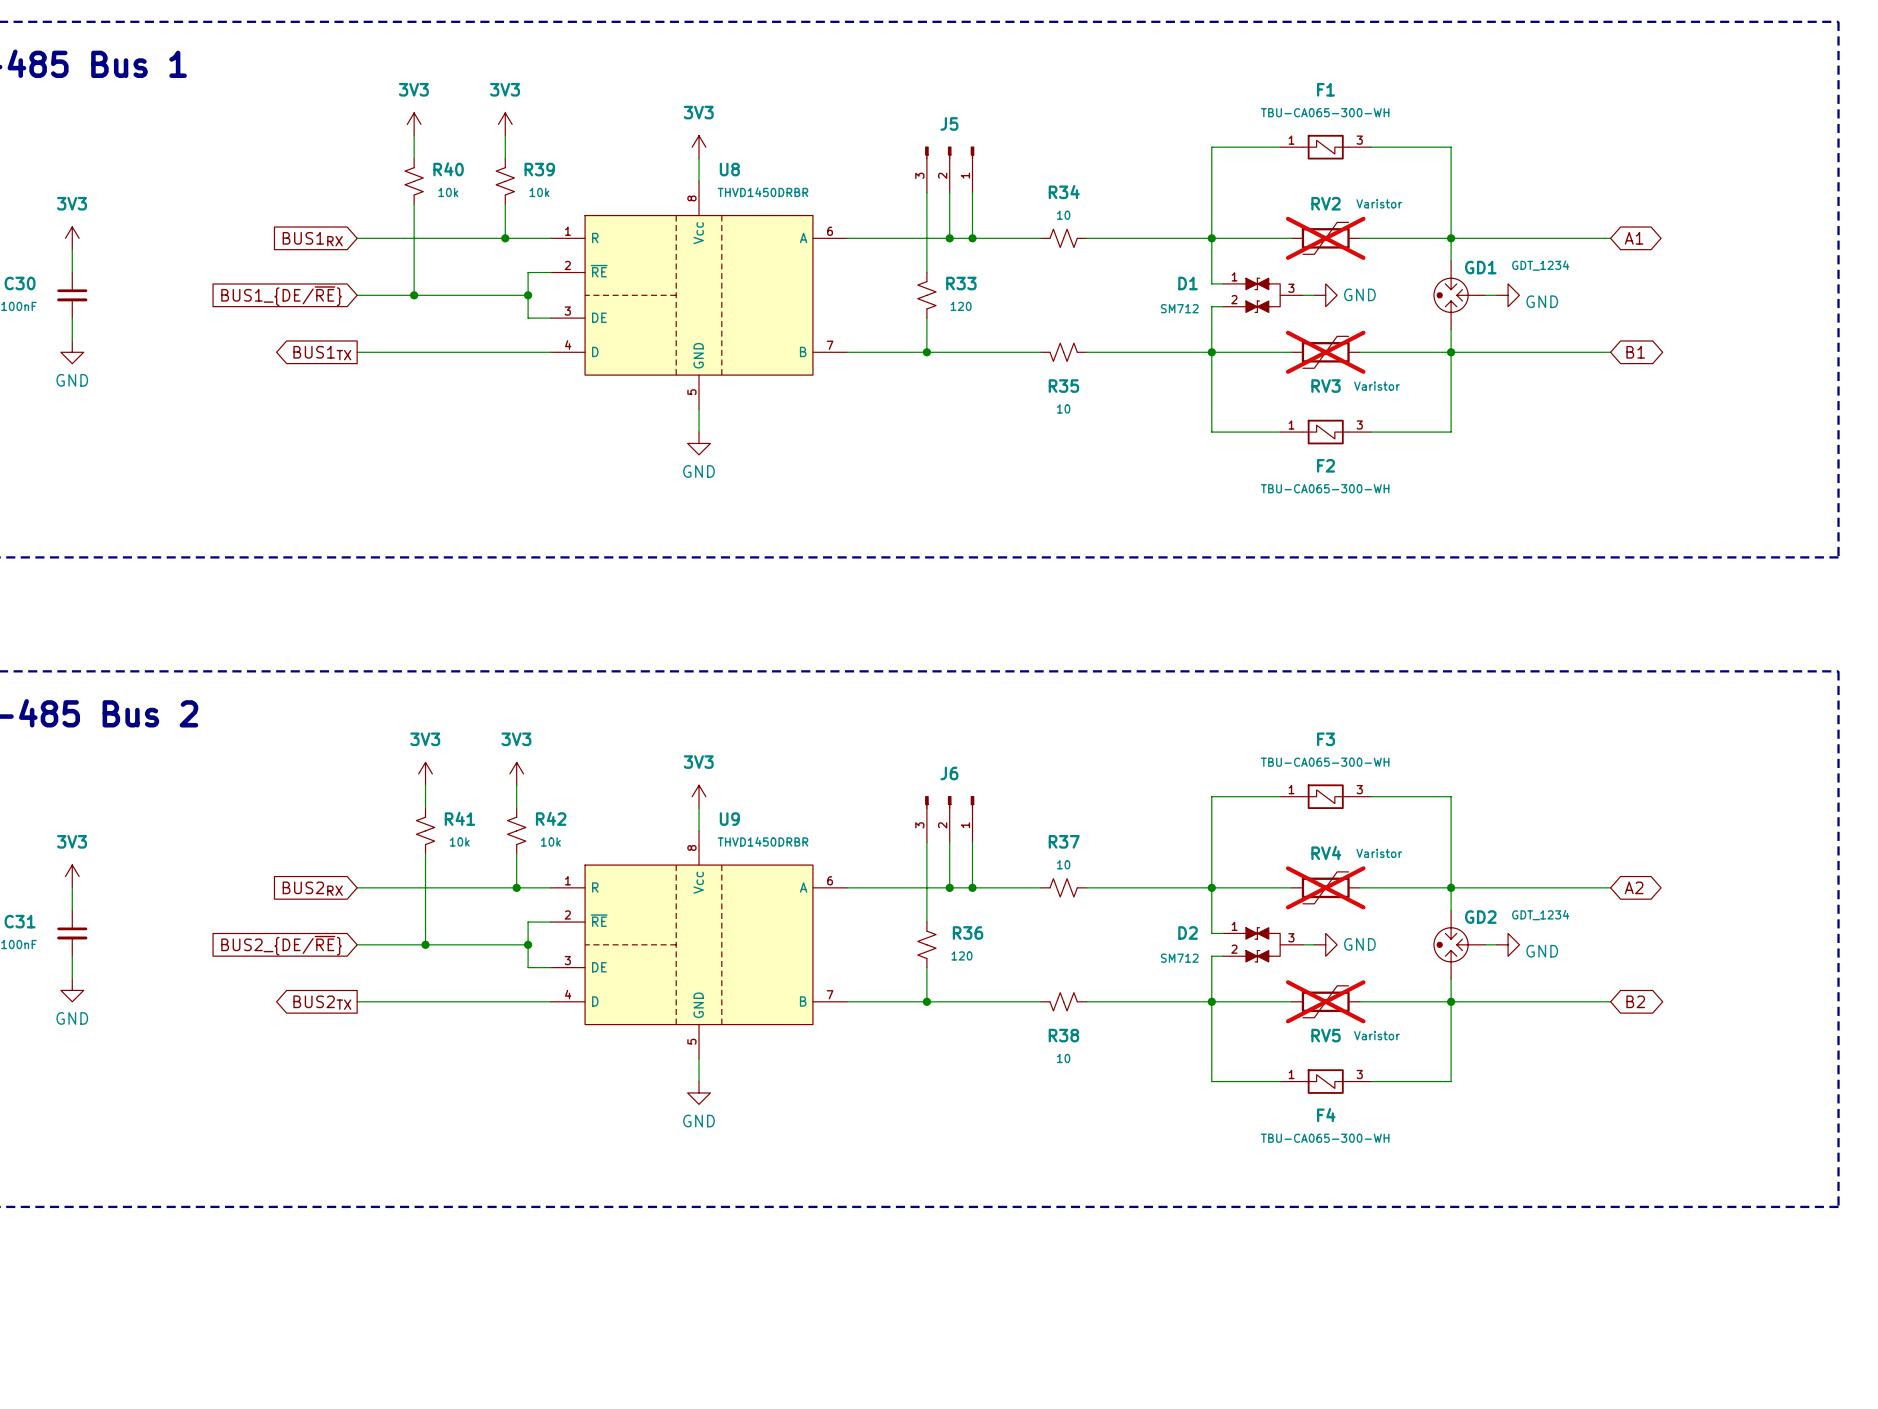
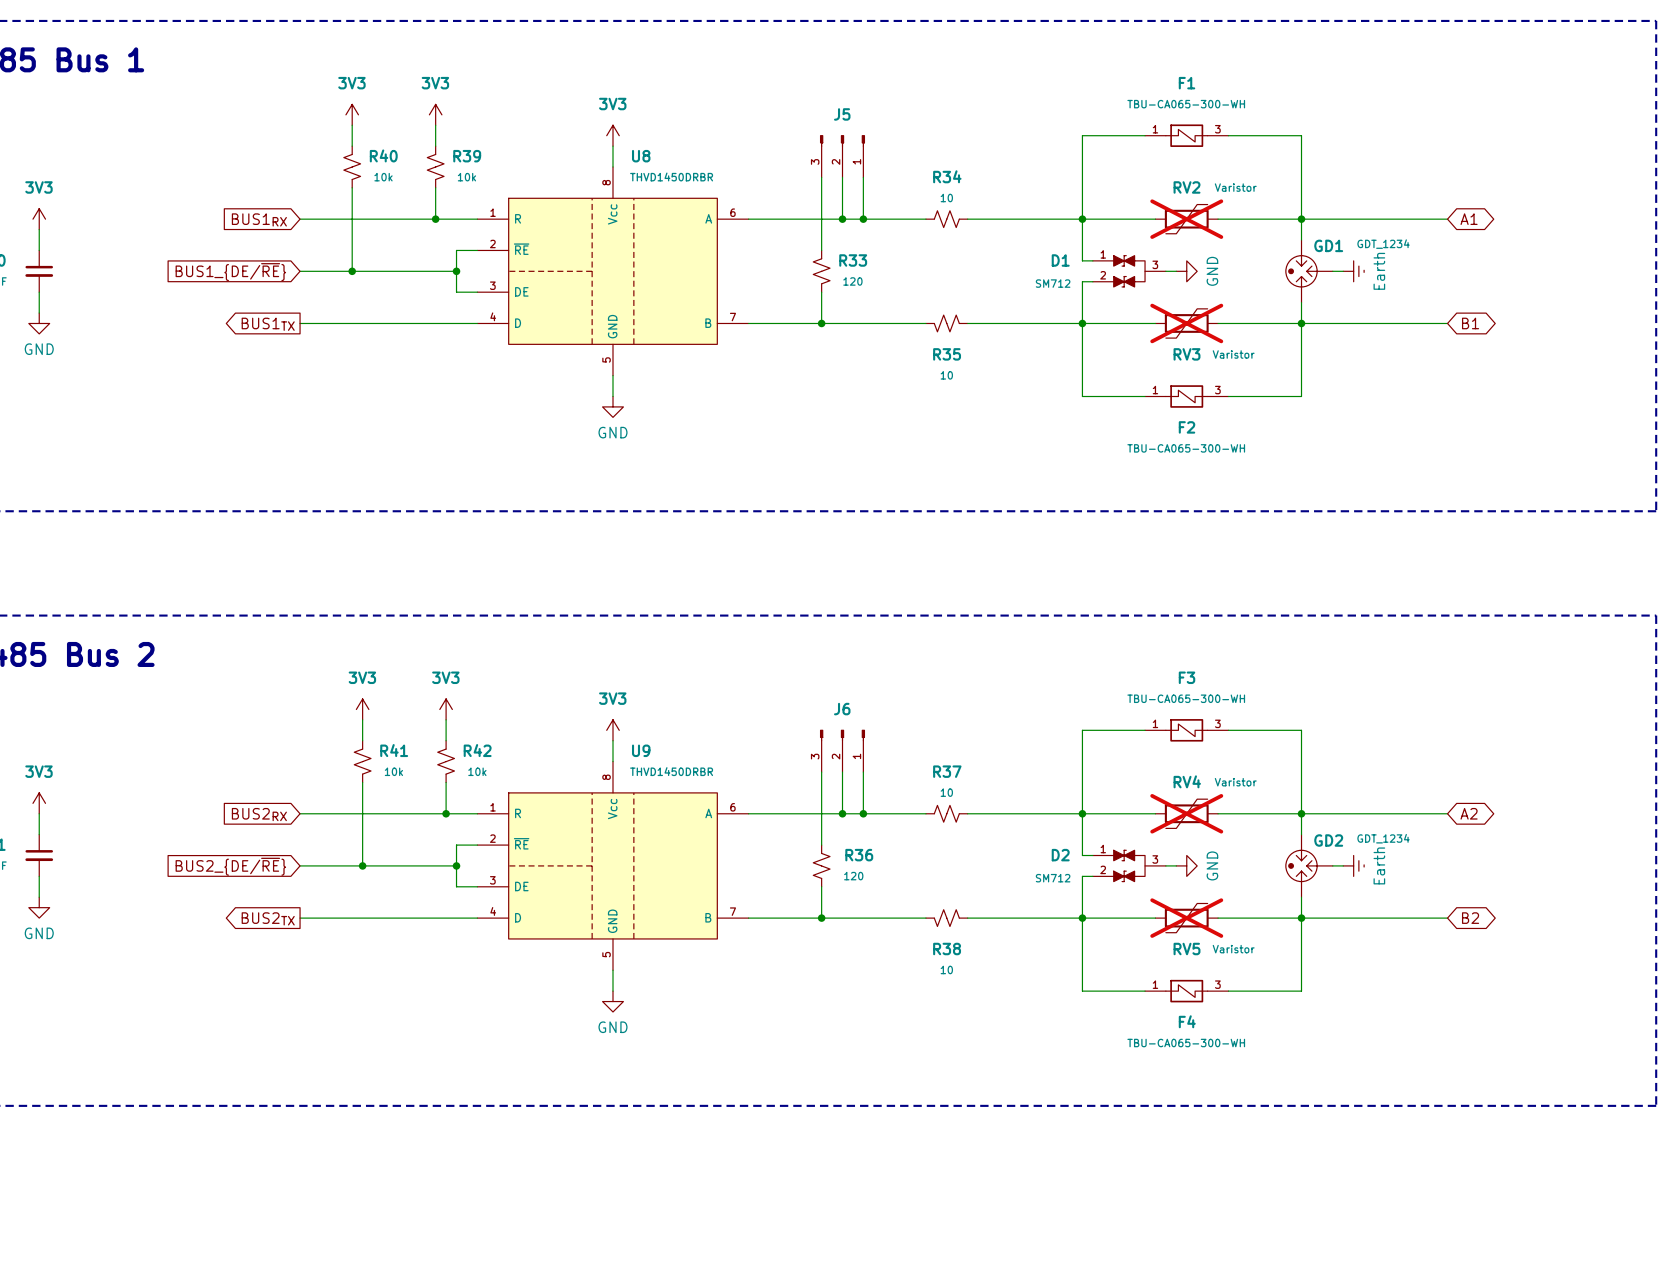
power symbol text rotation: 0° (1359, 294) -> 90° counterclockwise (1212, 271)
power symbol: GND (1508, 295) -> Earth (1353, 271)
power symbol text rotation: 0° (1359, 944) -> 90° counterclockwise (1212, 865)
power symbol: GND (1508, 944) -> Earth (1353, 865)

